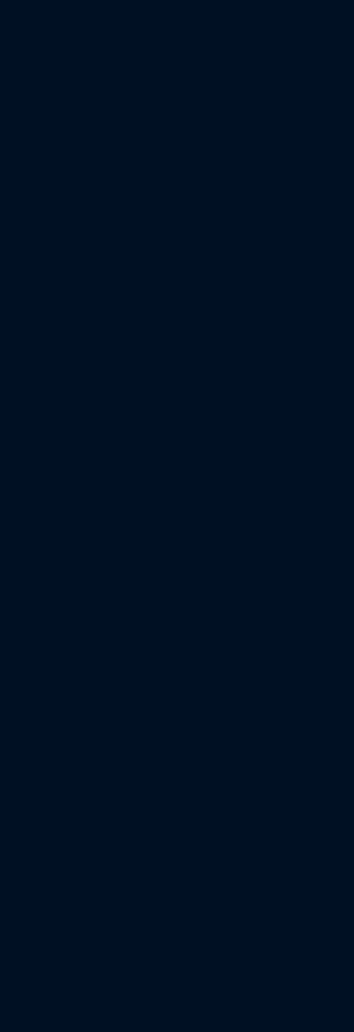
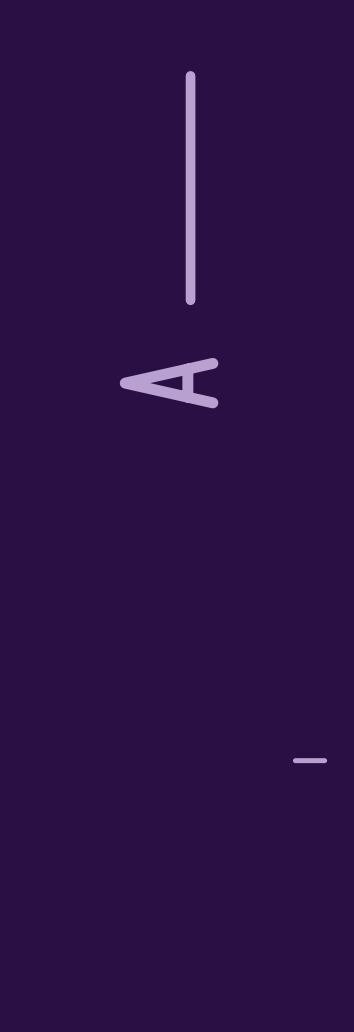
line: none -> (190, 75) (190, 300)
text: none -> A (169, 383)
line: none -> (295, 760) (324, 760)

